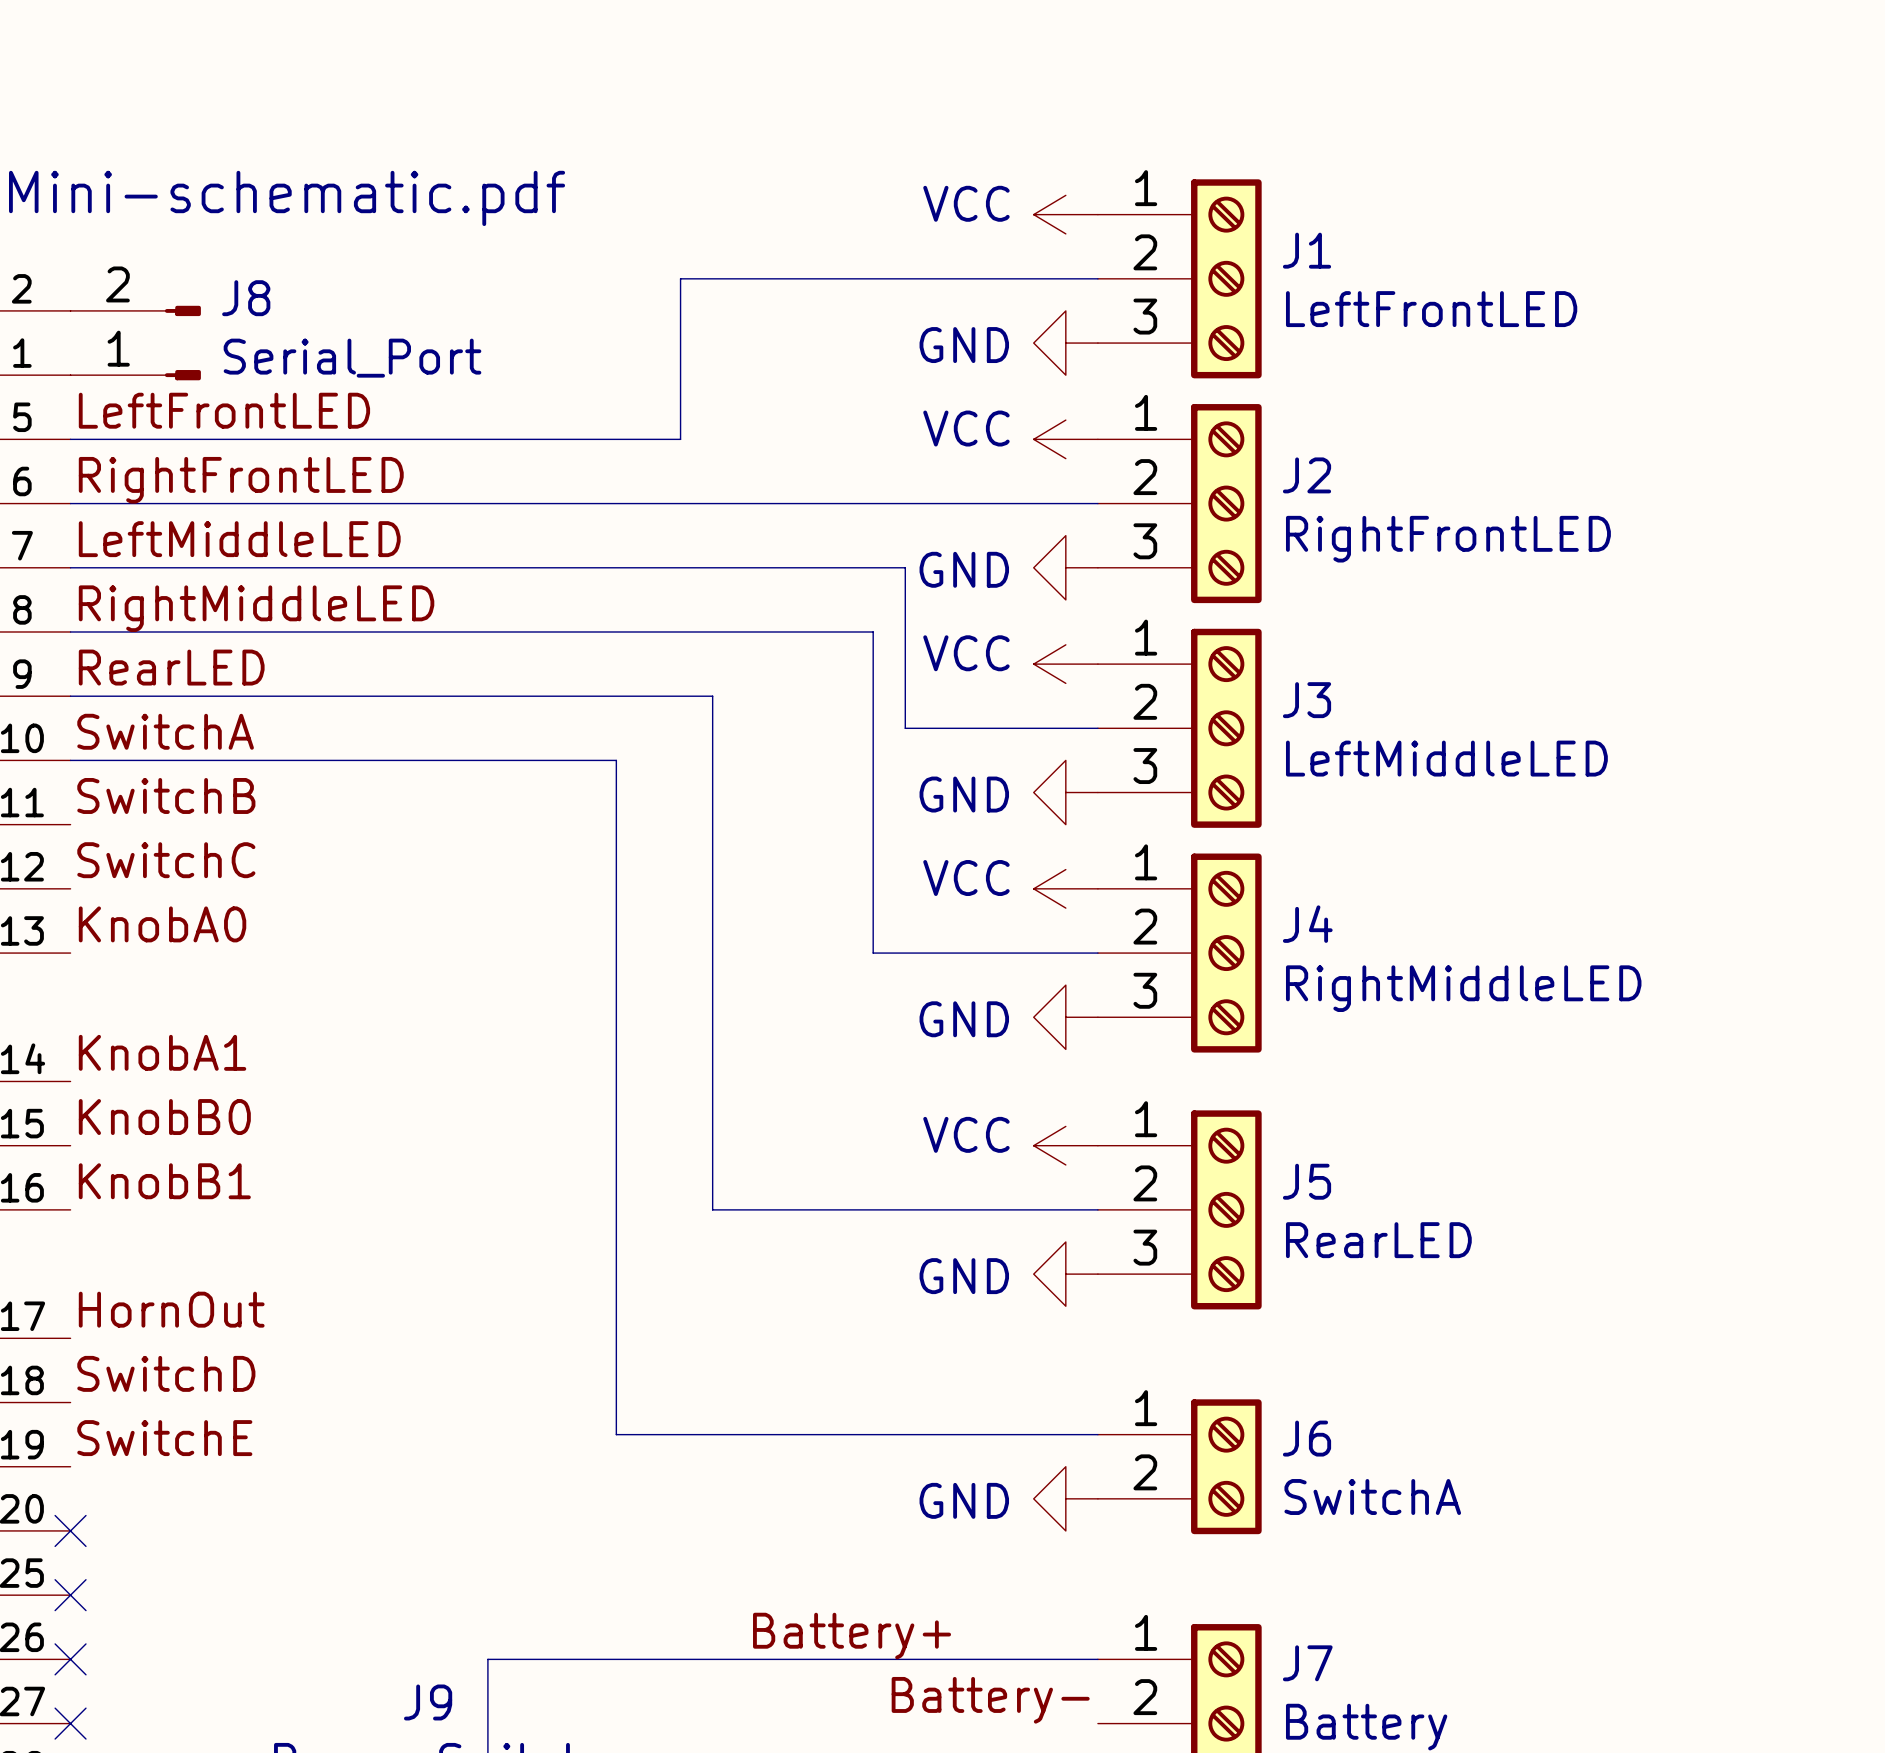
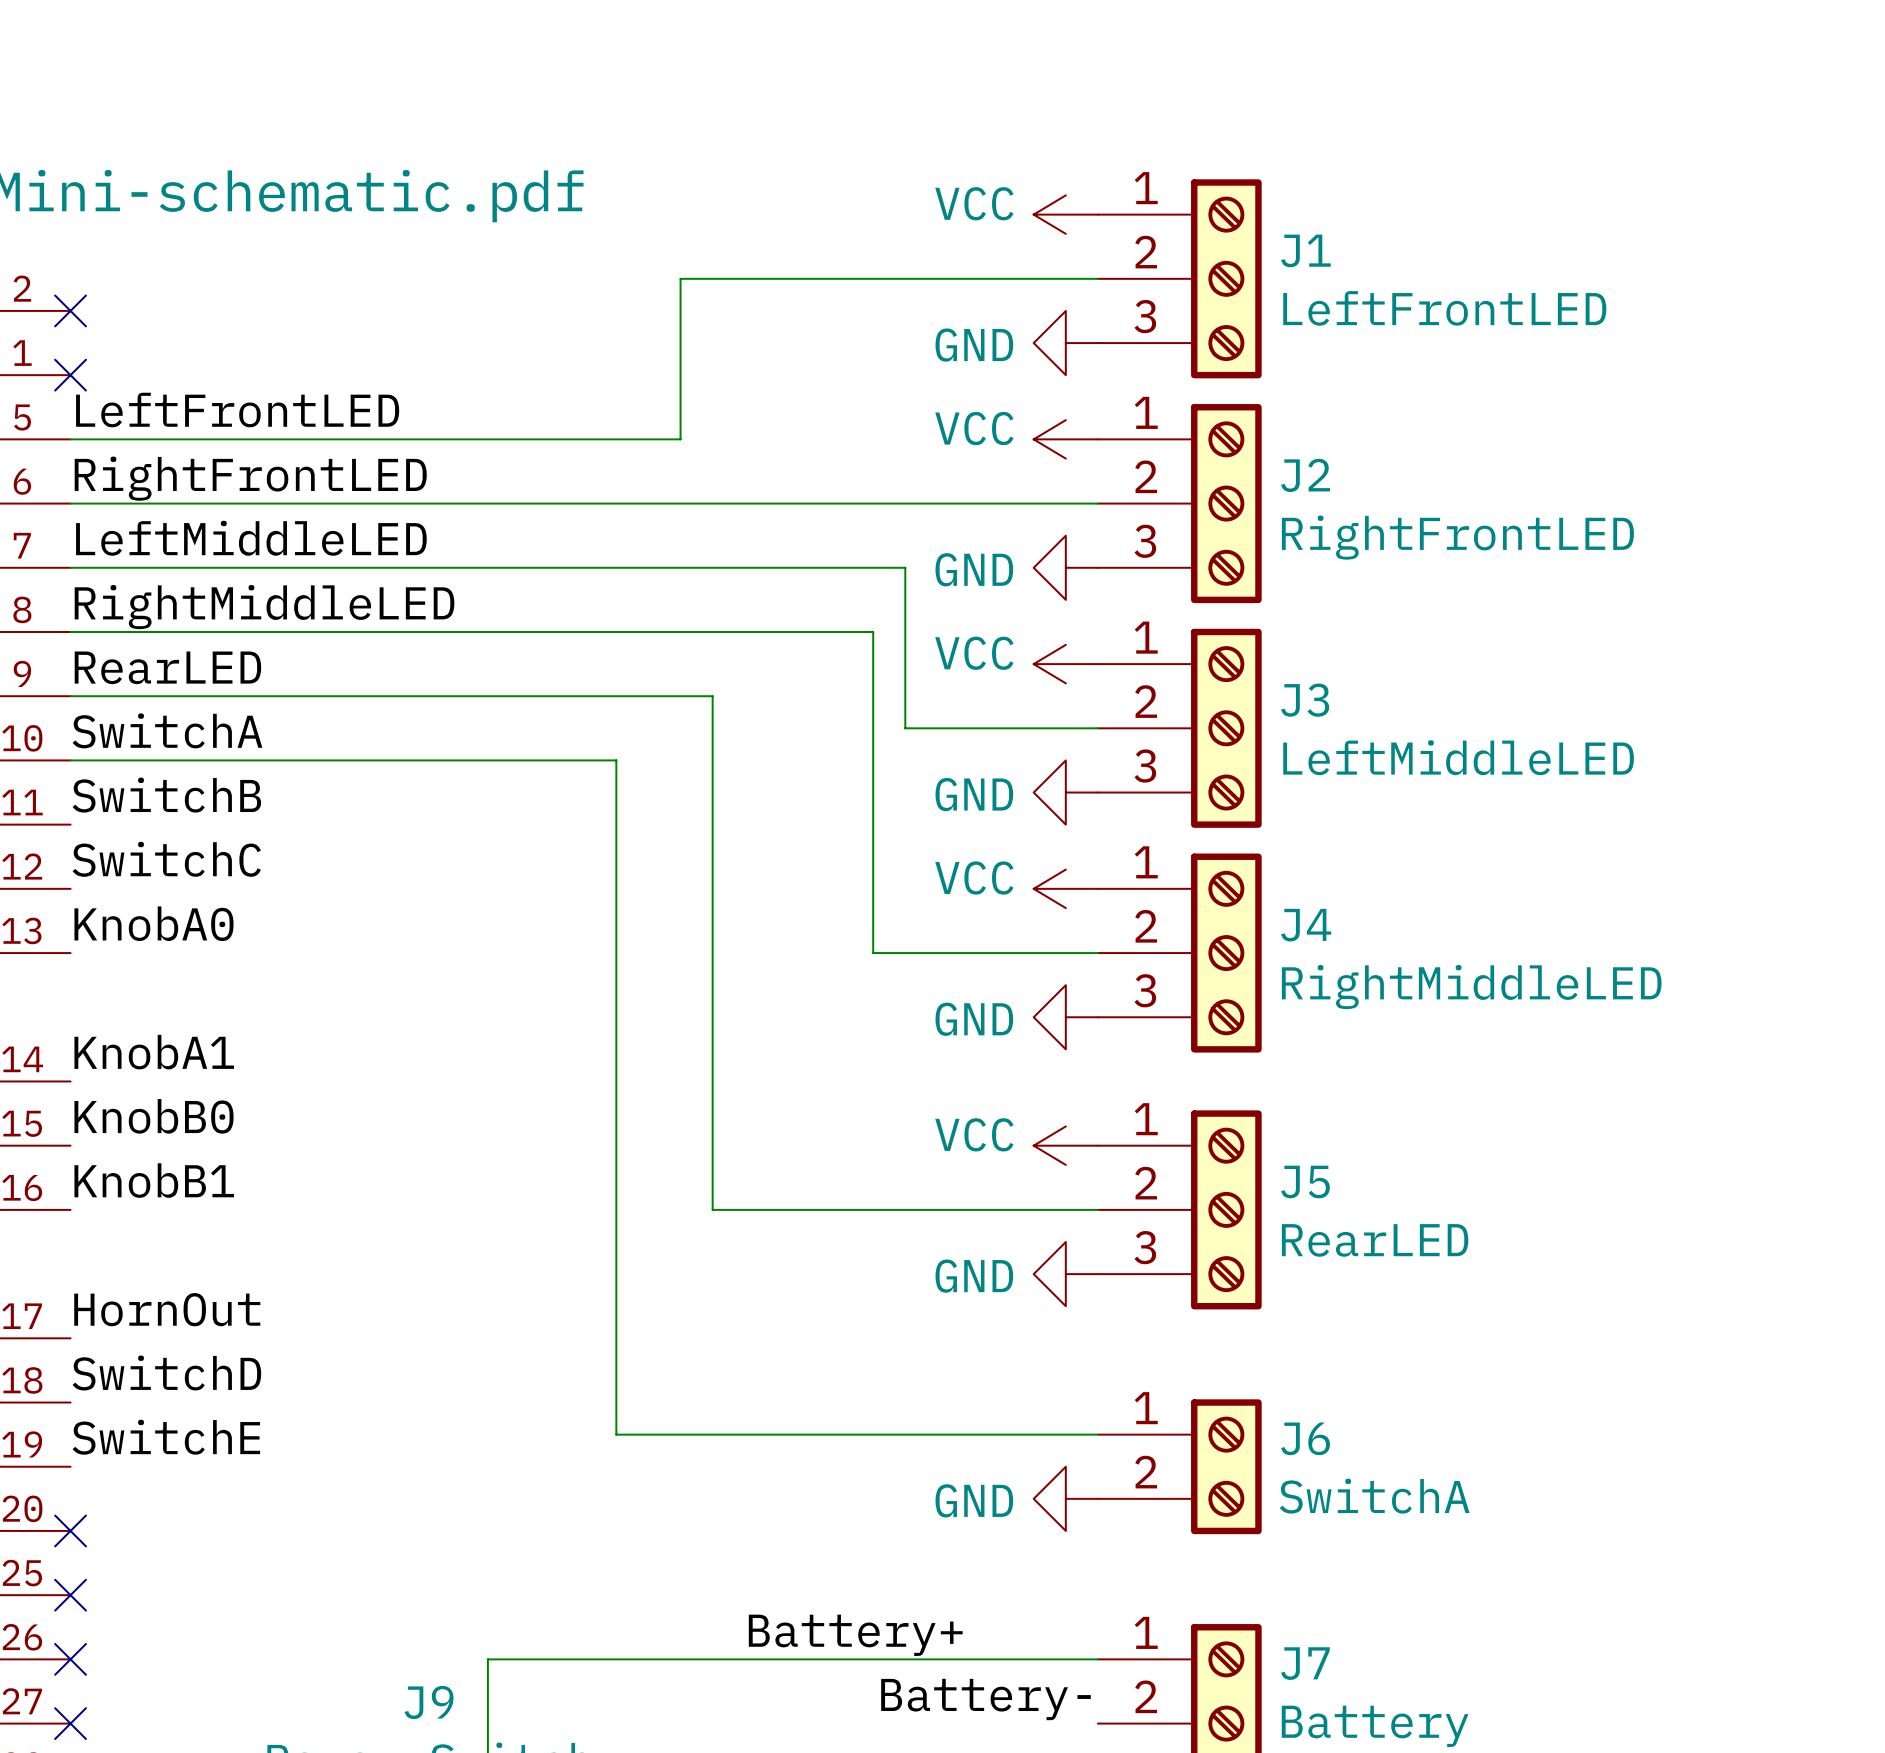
no-connect mark: none -> (70, 310)
J8: Serial_Port (135, 343) -> none
no-connect mark: none -> (70, 375)

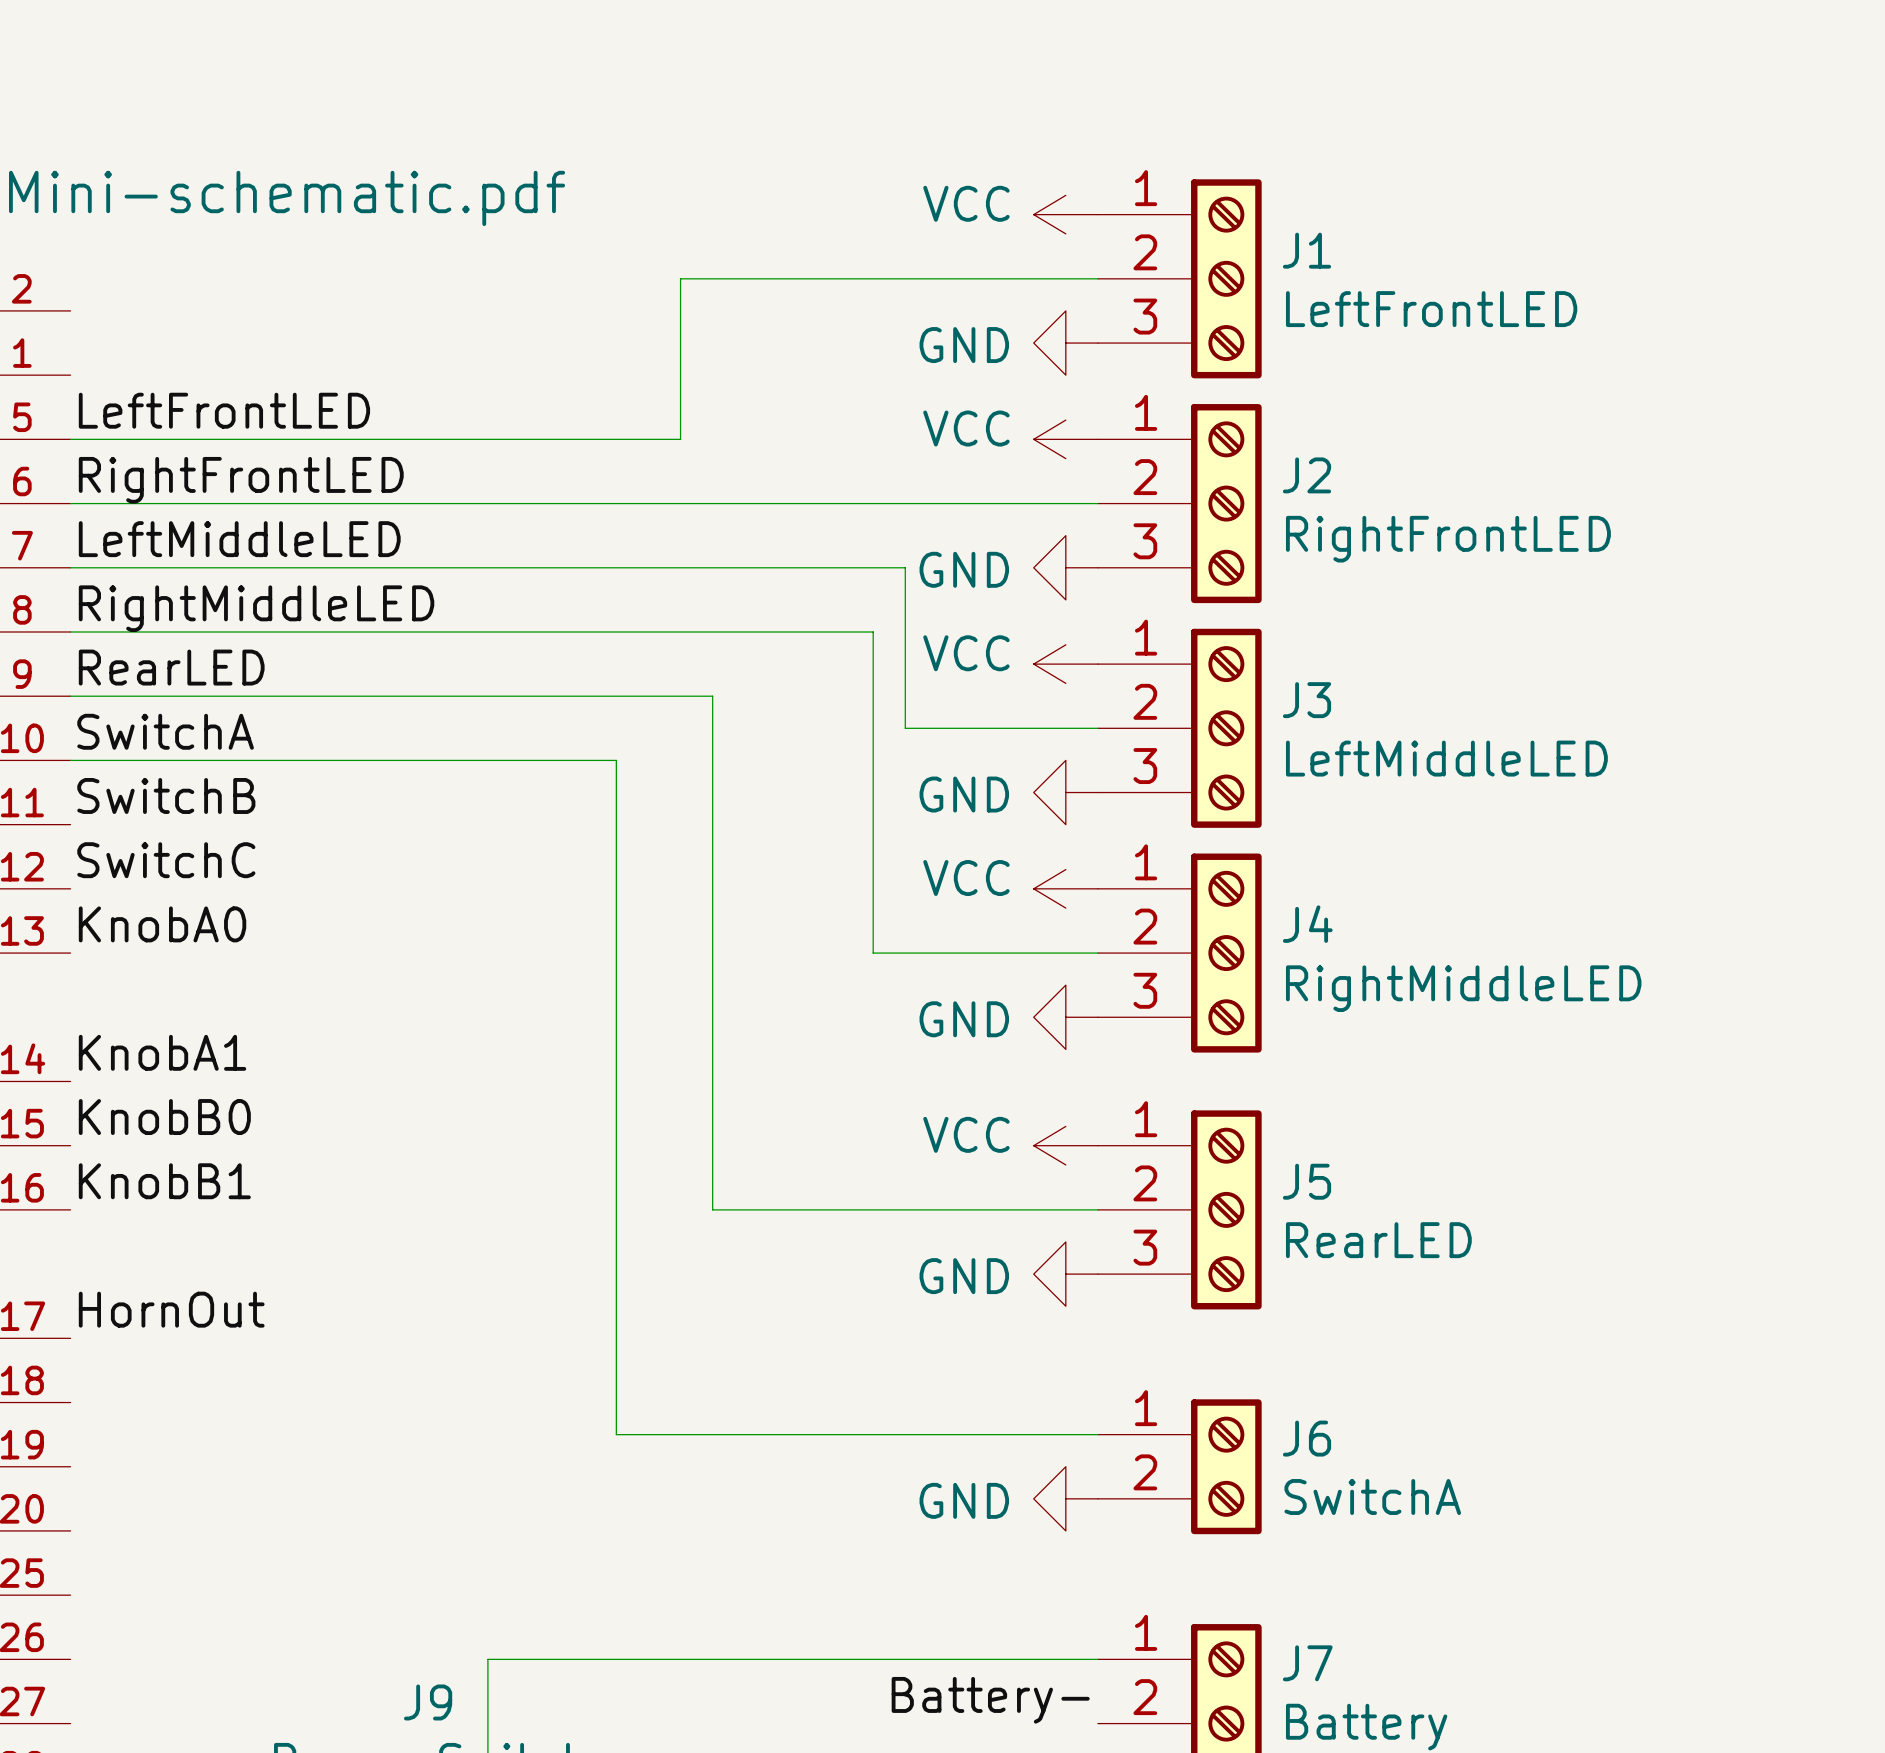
no-connect mark: (70, 310) -> none
no-connect mark: (70, 375) -> none
label: SwitchD (166, 1373) -> none
label: SwitchE (166, 1437) -> none
no-connect mark: (70, 1530) -> none
no-connect mark: (70, 1595) -> none
label: Battery+ (855, 1635) -> none
no-connect mark: (70, 1659) -> none
no-connect mark: (70, 1723) -> none

